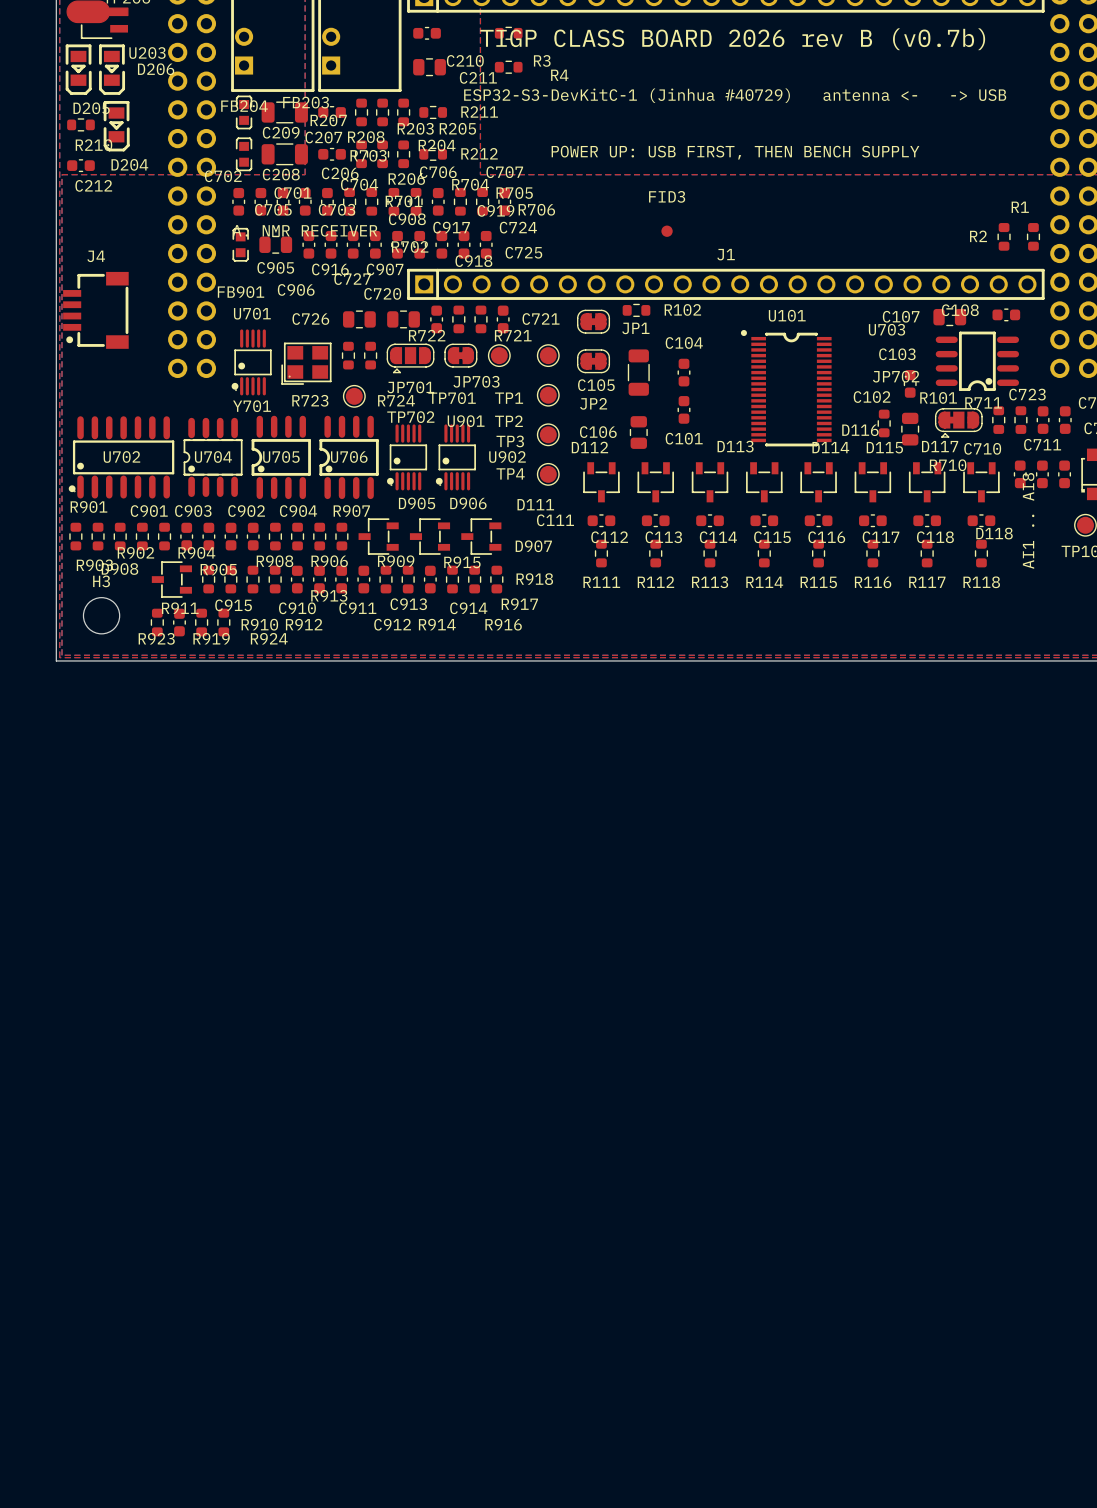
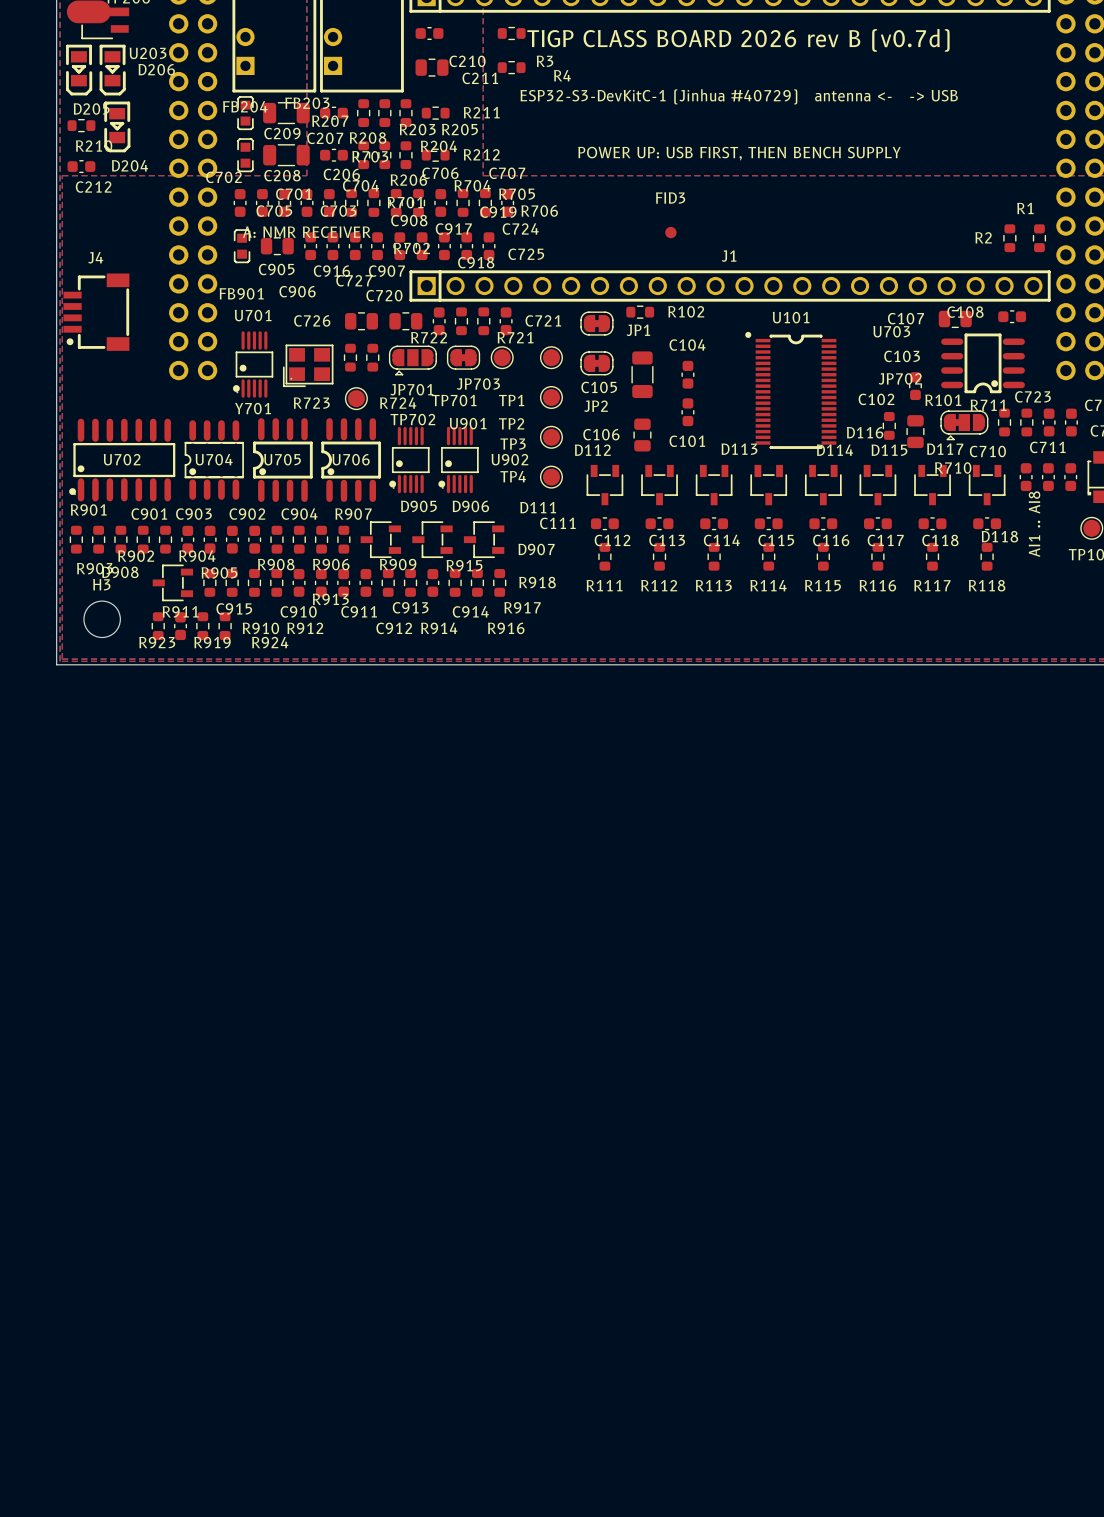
text: TIGP CLASS BOARD 2026 rev B (v0.7b) (732, 39) -> TIGP CLASS BOARD 2026 rev B (v0.7d) (738, 40)

